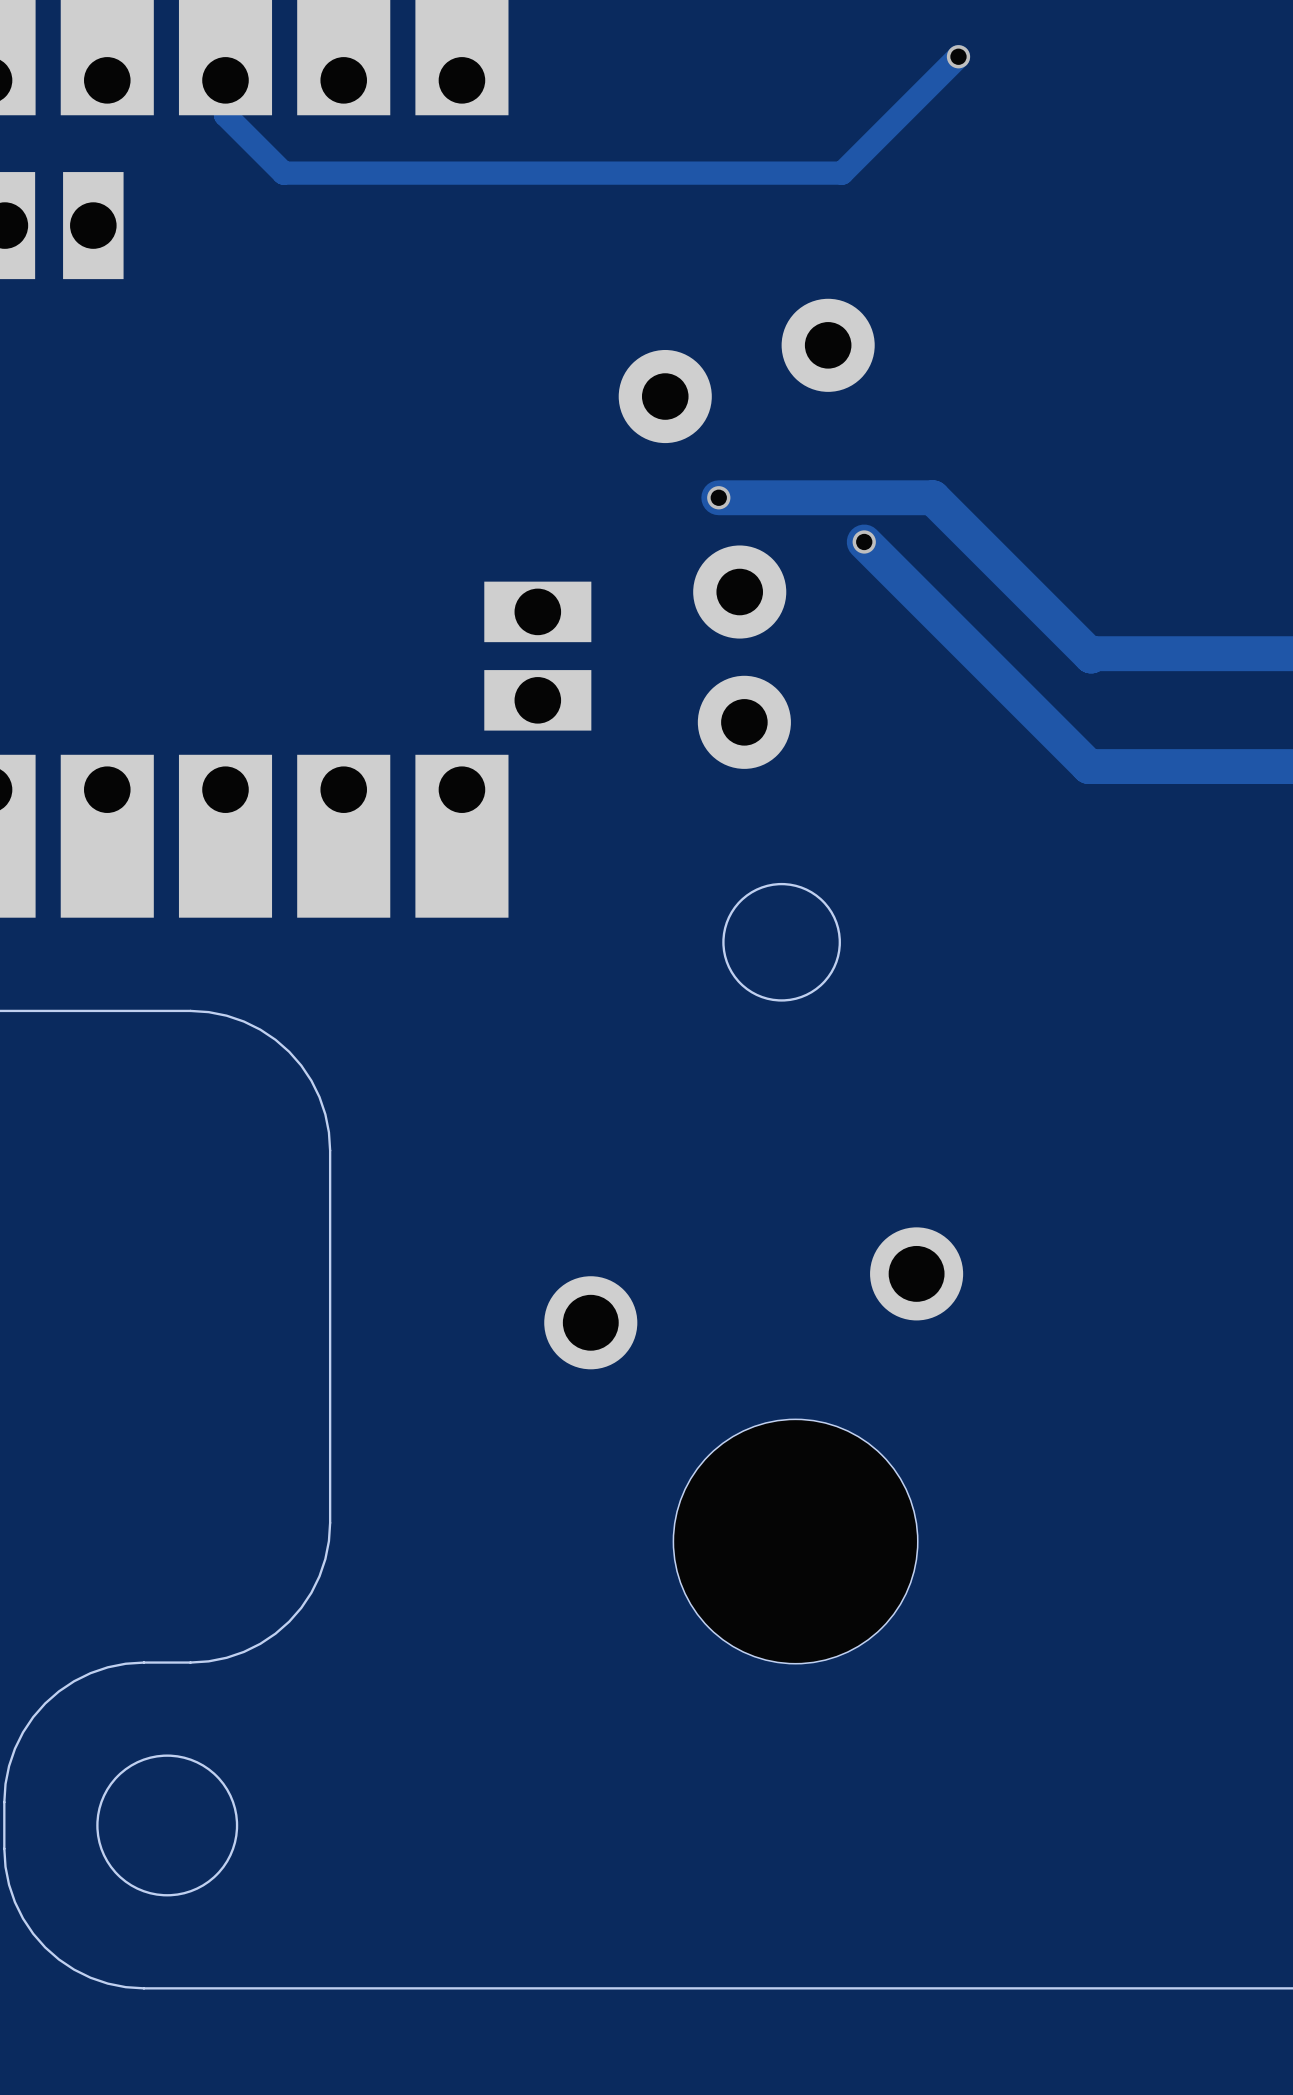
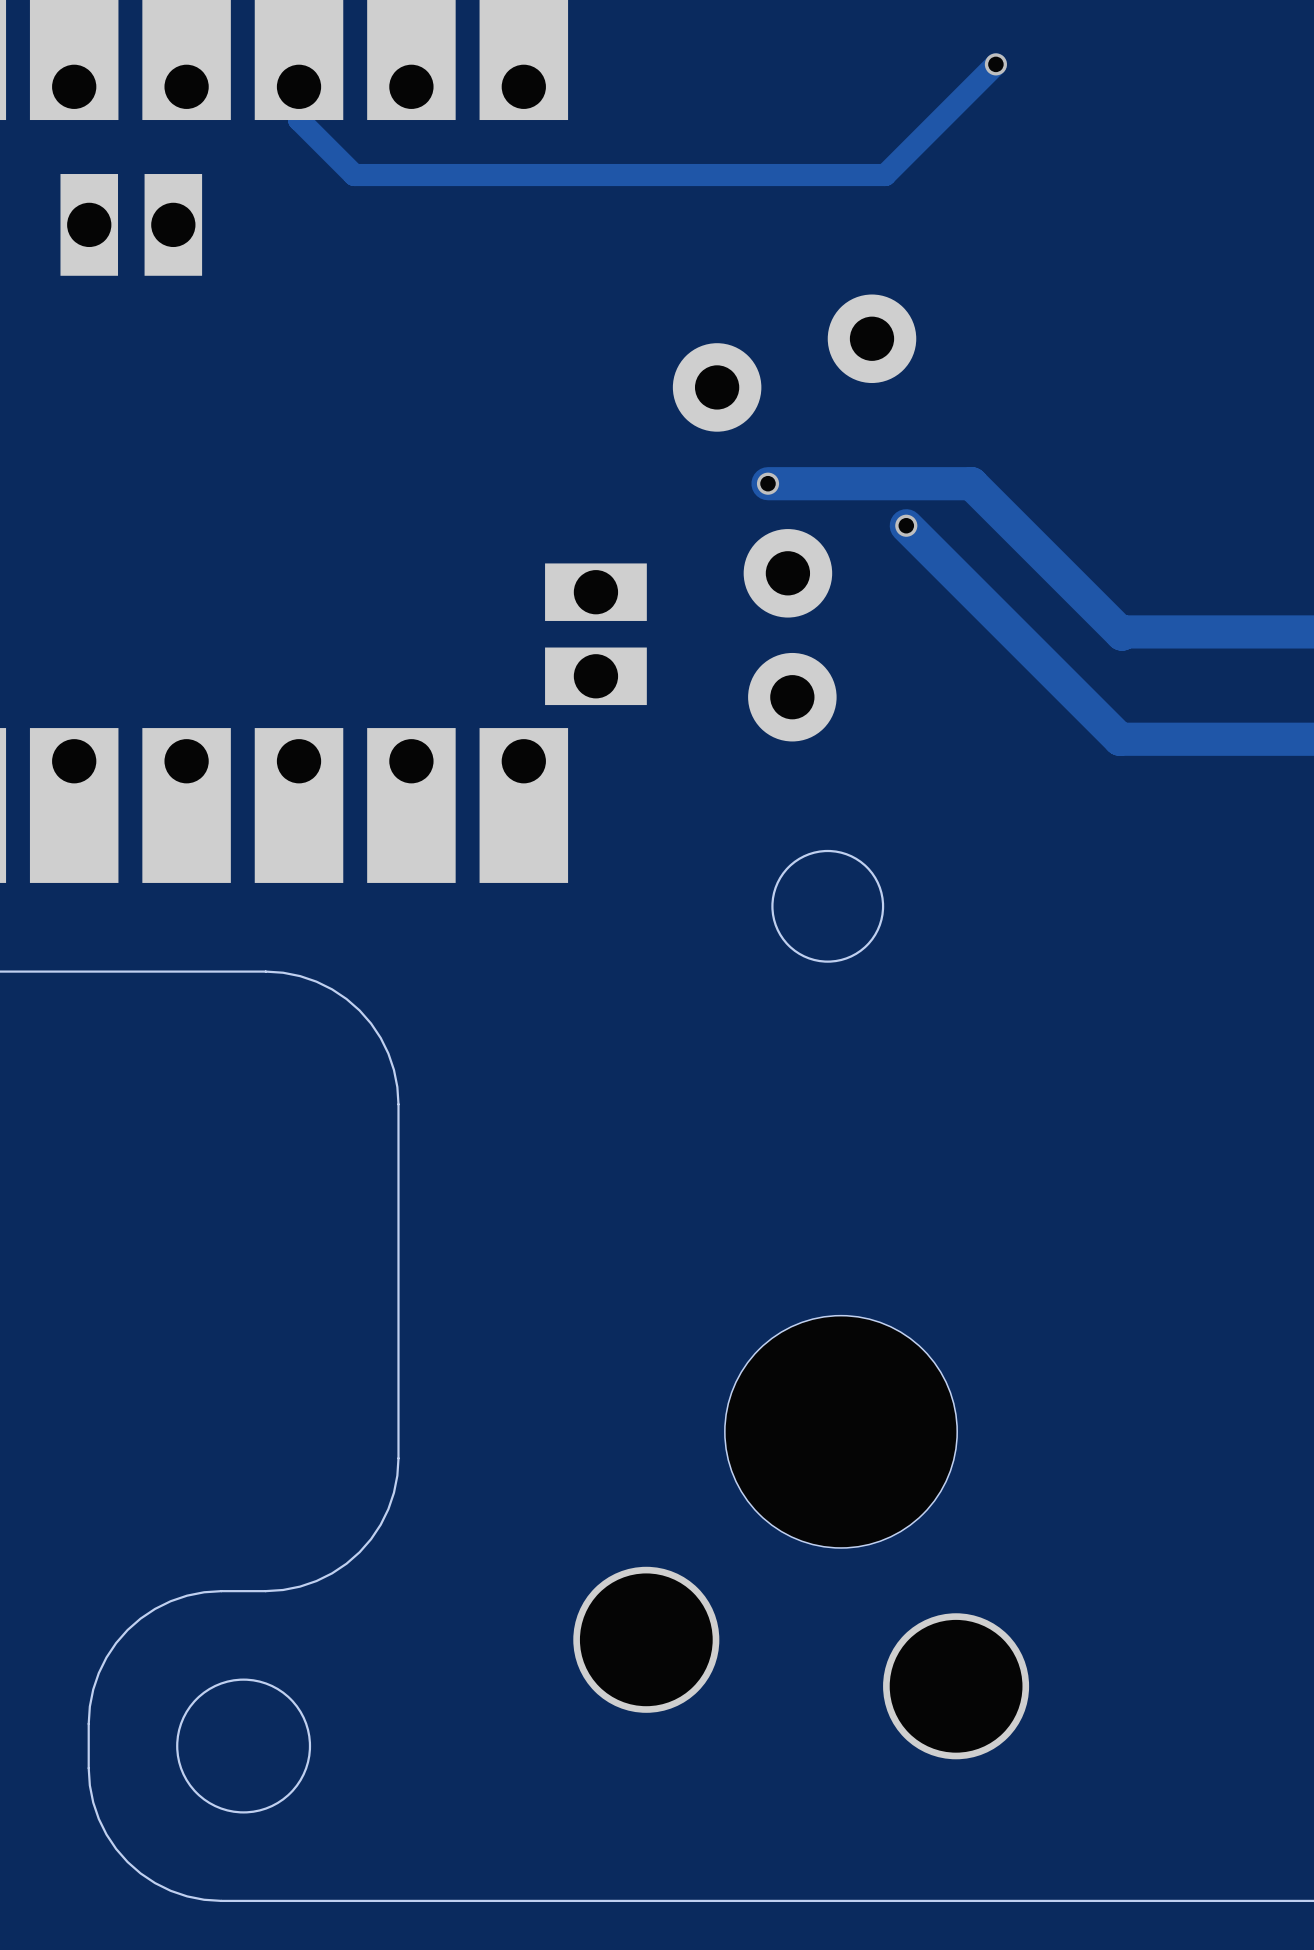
part: (753, 1445) -> none
part: none -> (801, 1537)

